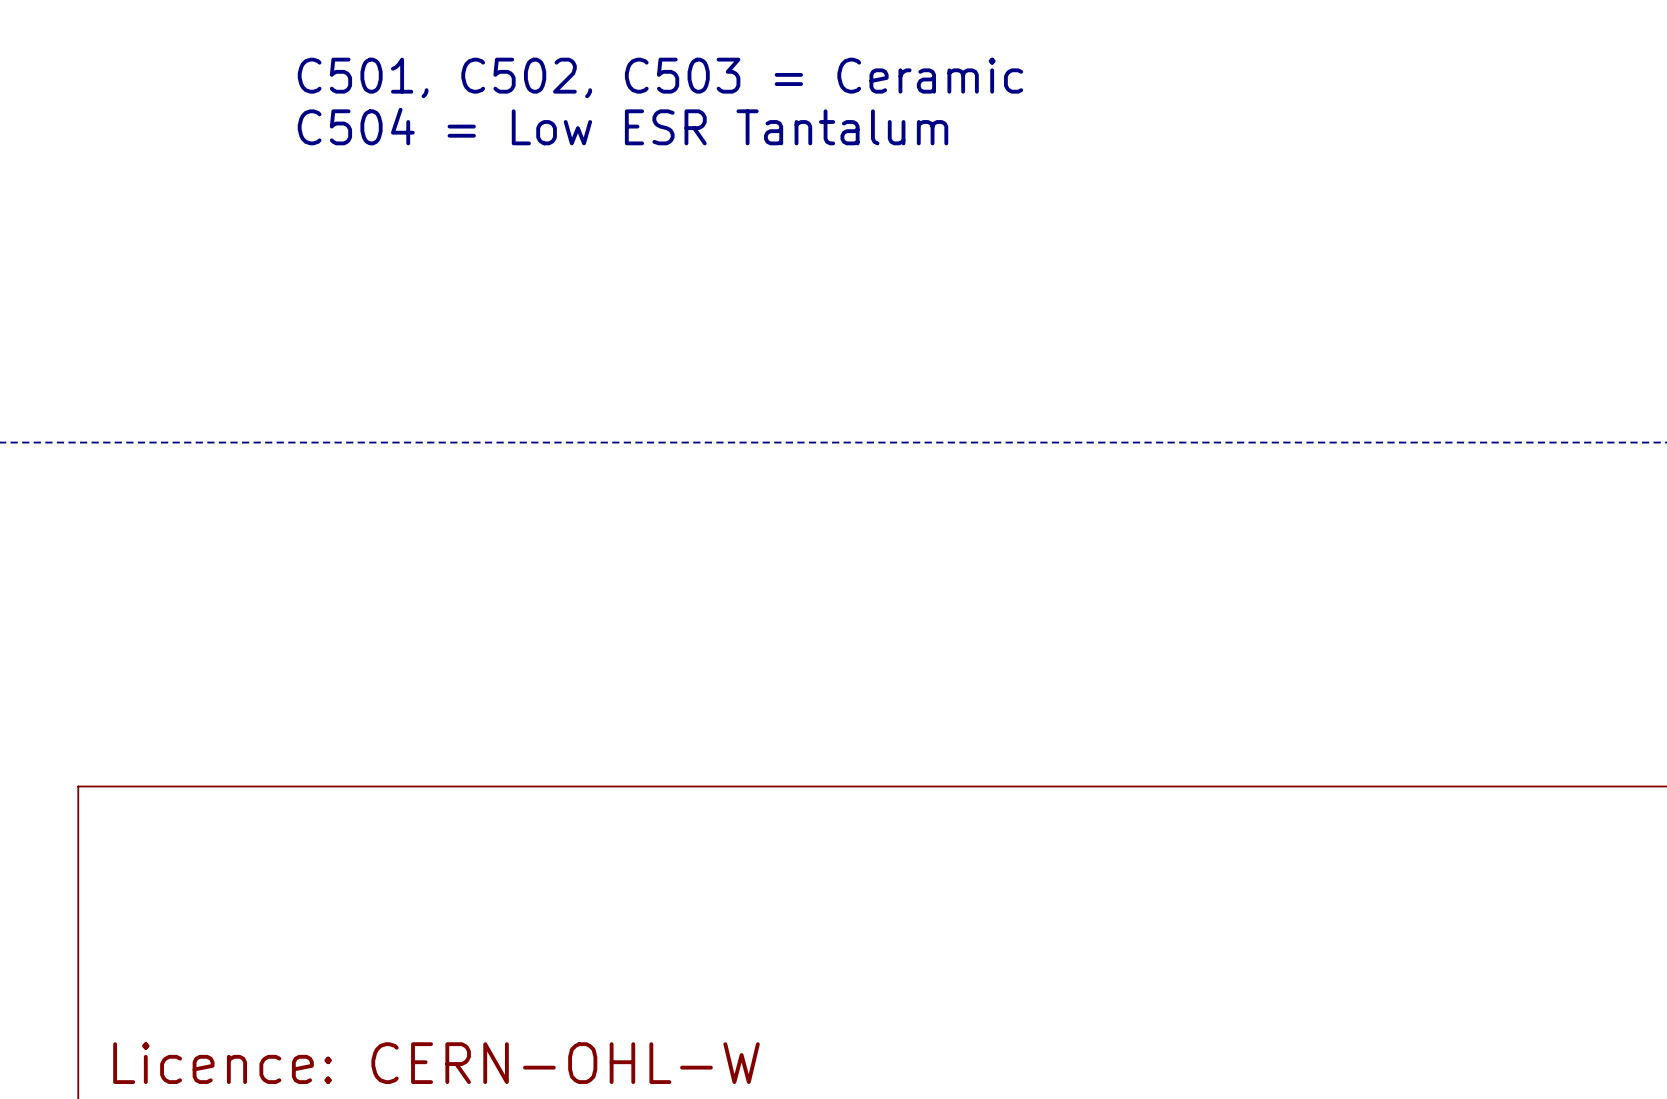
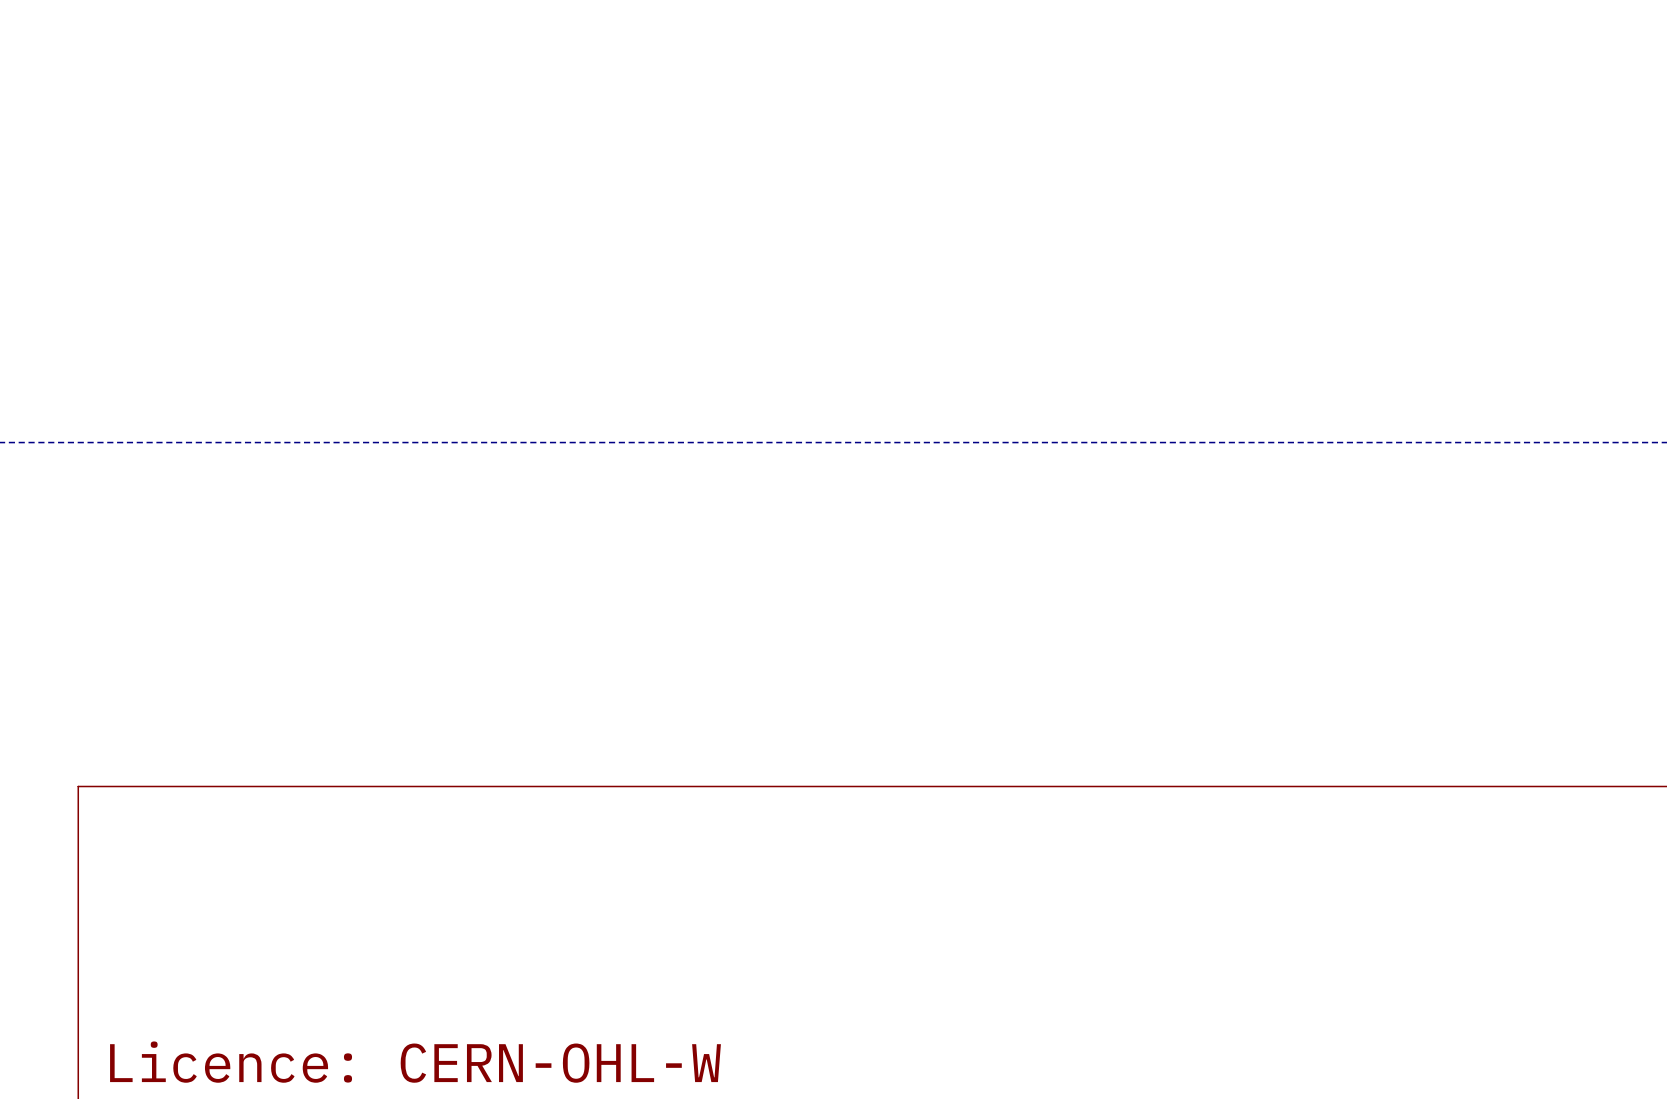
text: C501, C502, C503 = Ceramic (660, 77) -> none
text: C504 = Low ESR Tantalum (623, 126) -> none

